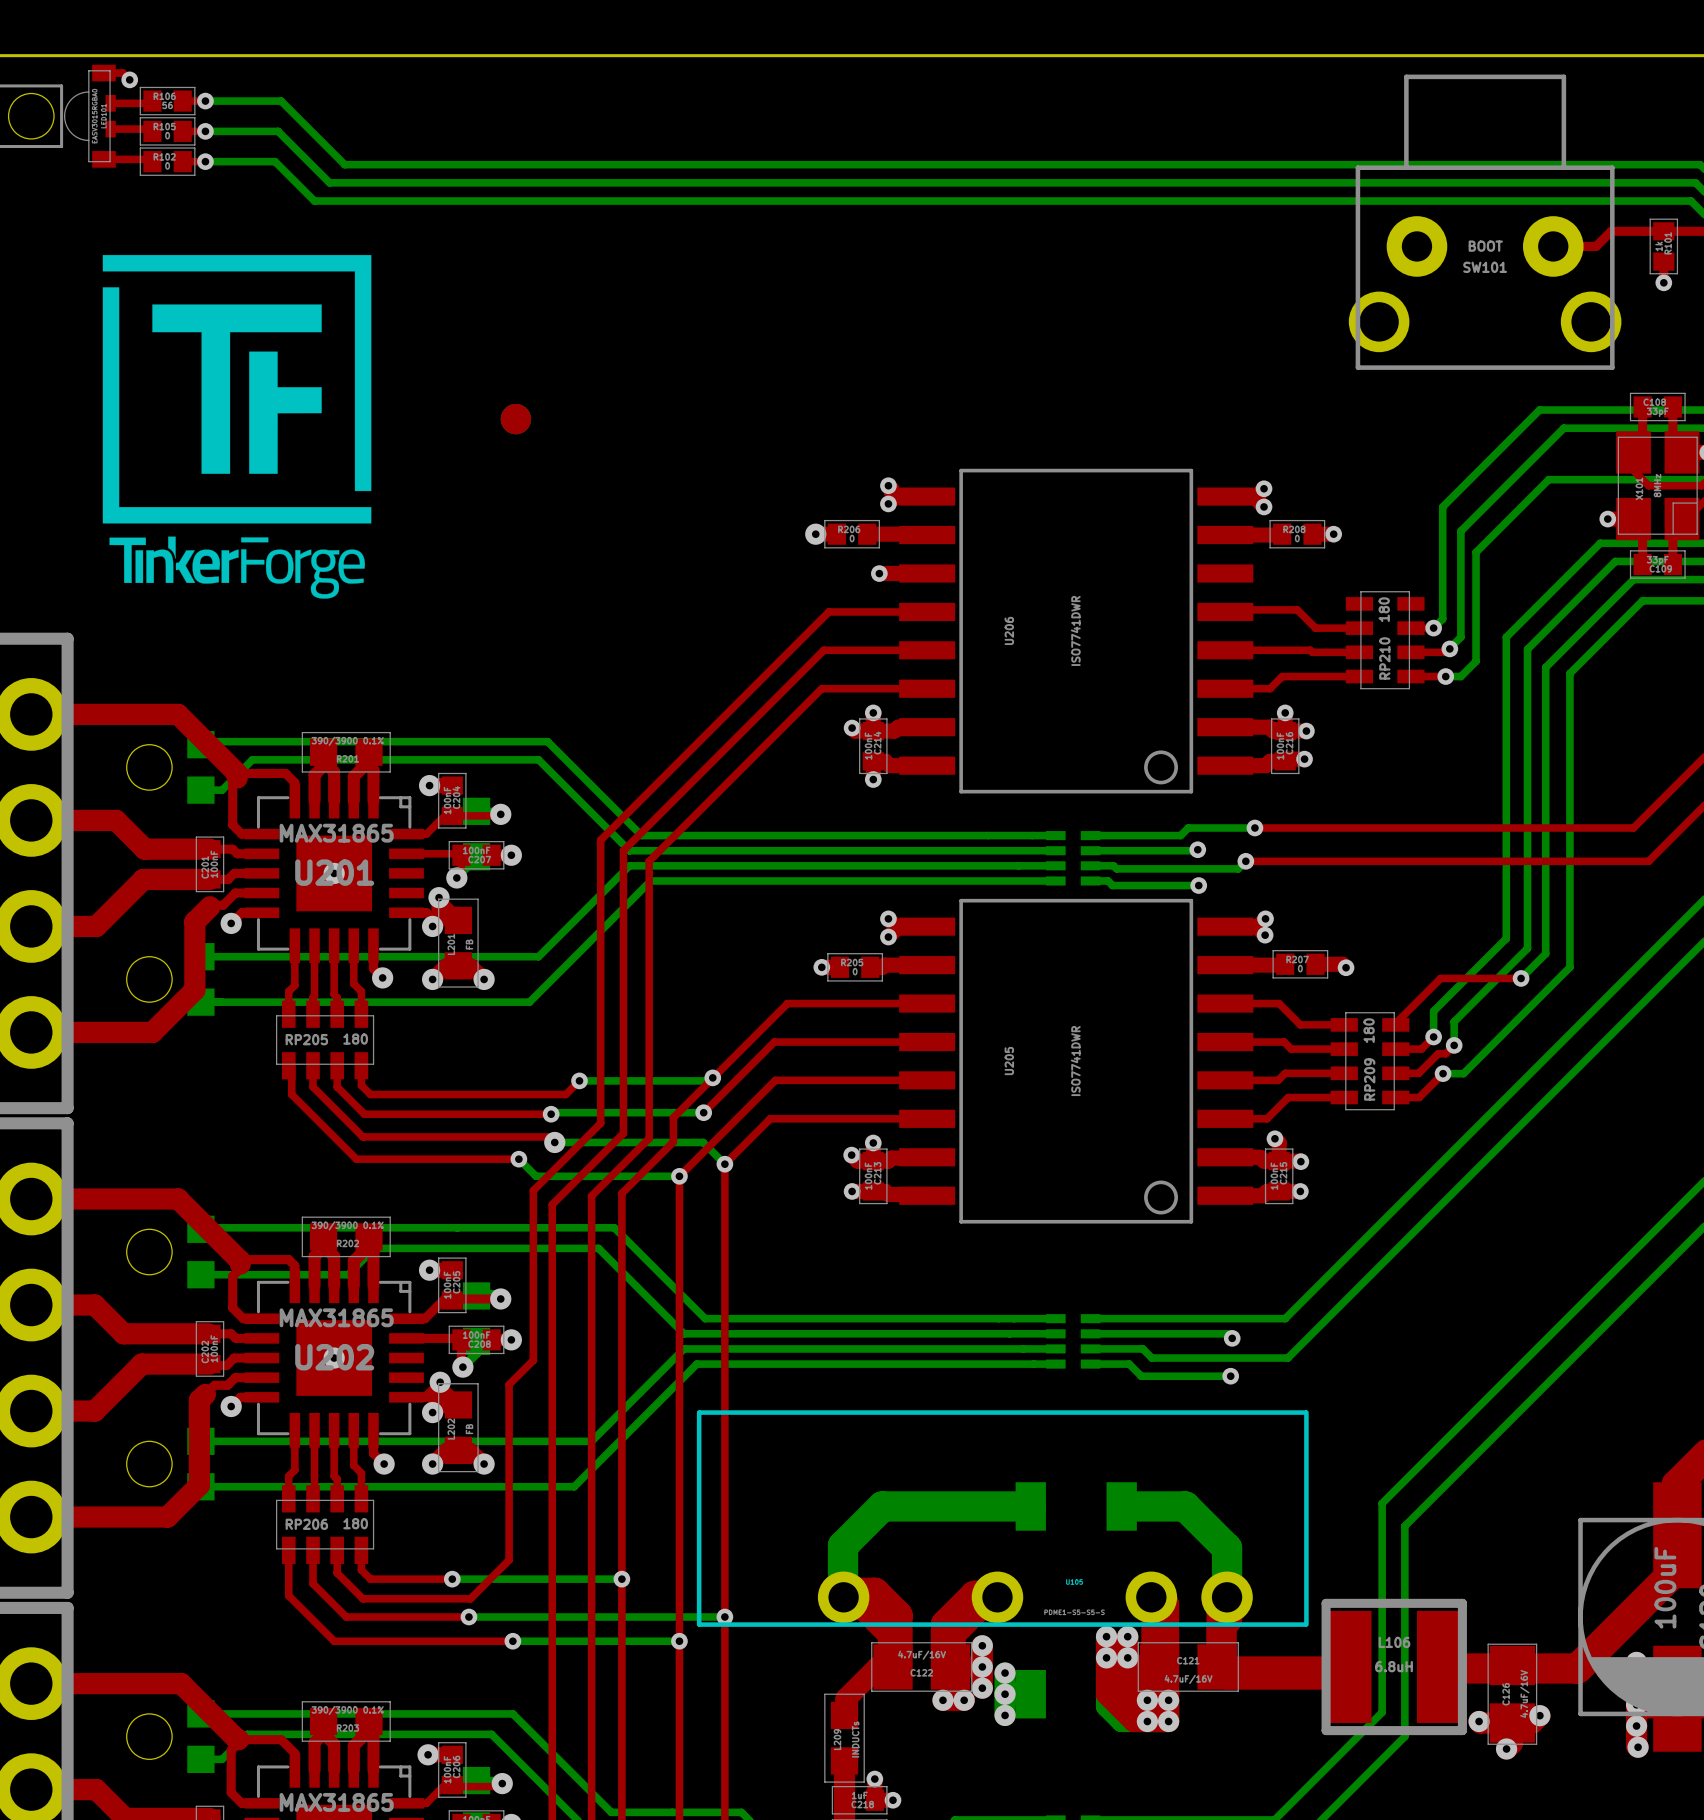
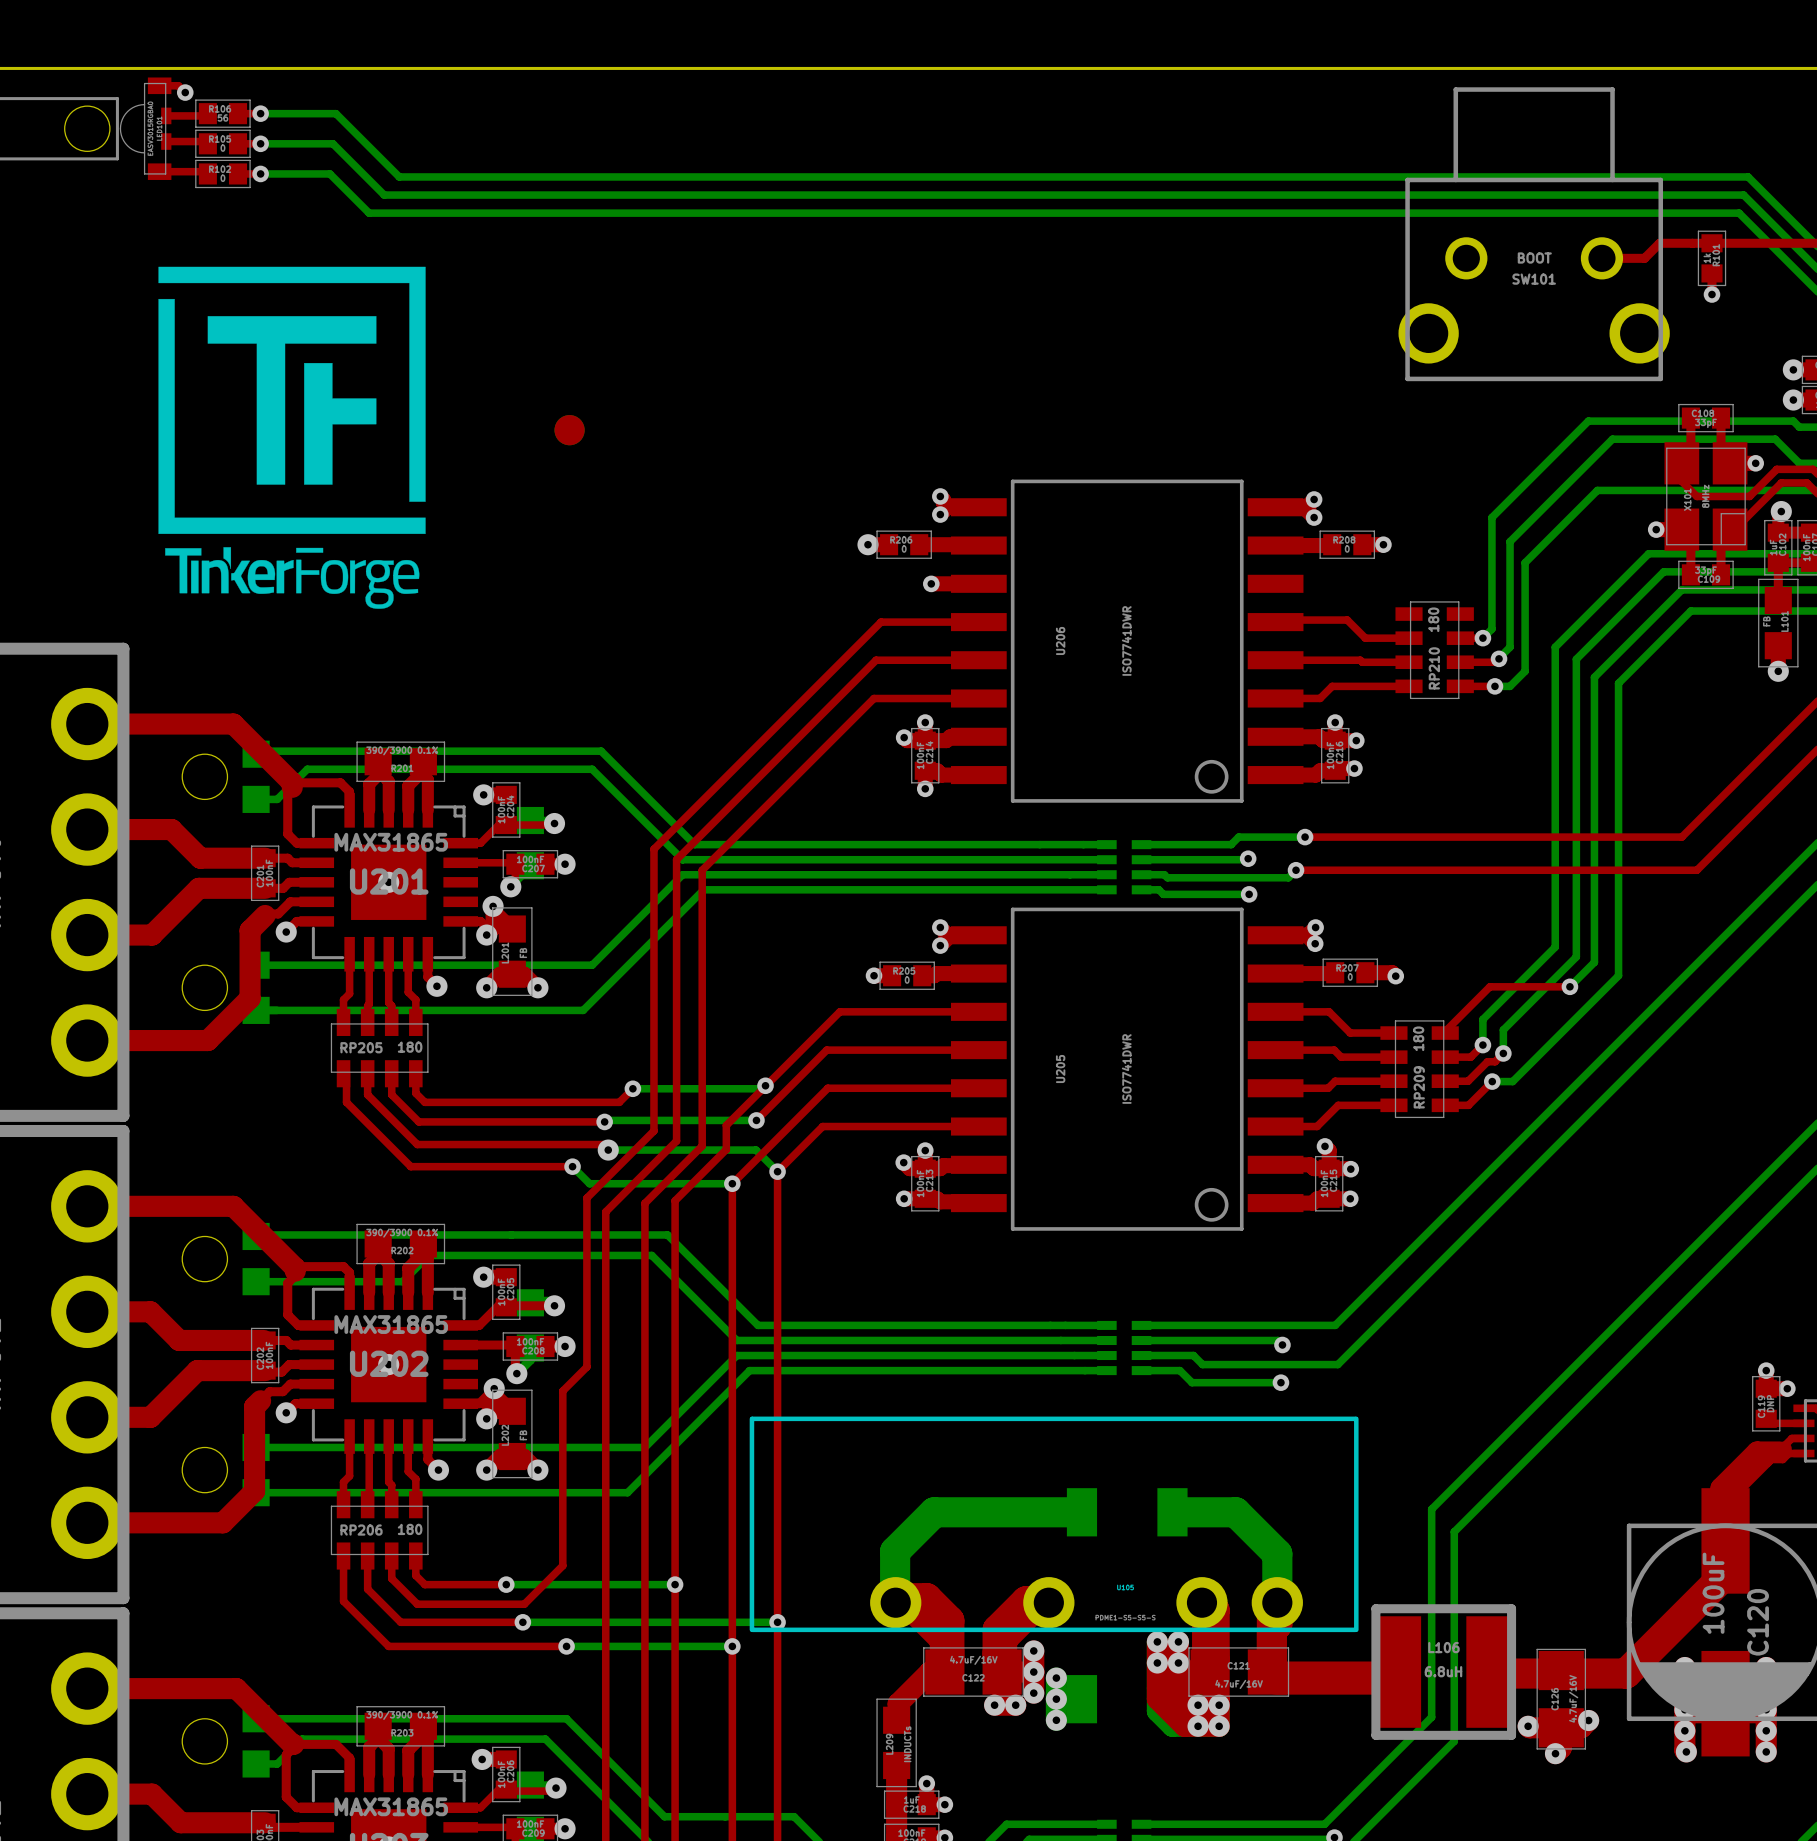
SW101 footprint: [1348, 74, 1622, 370] -> [1398, 87, 1670, 382]

